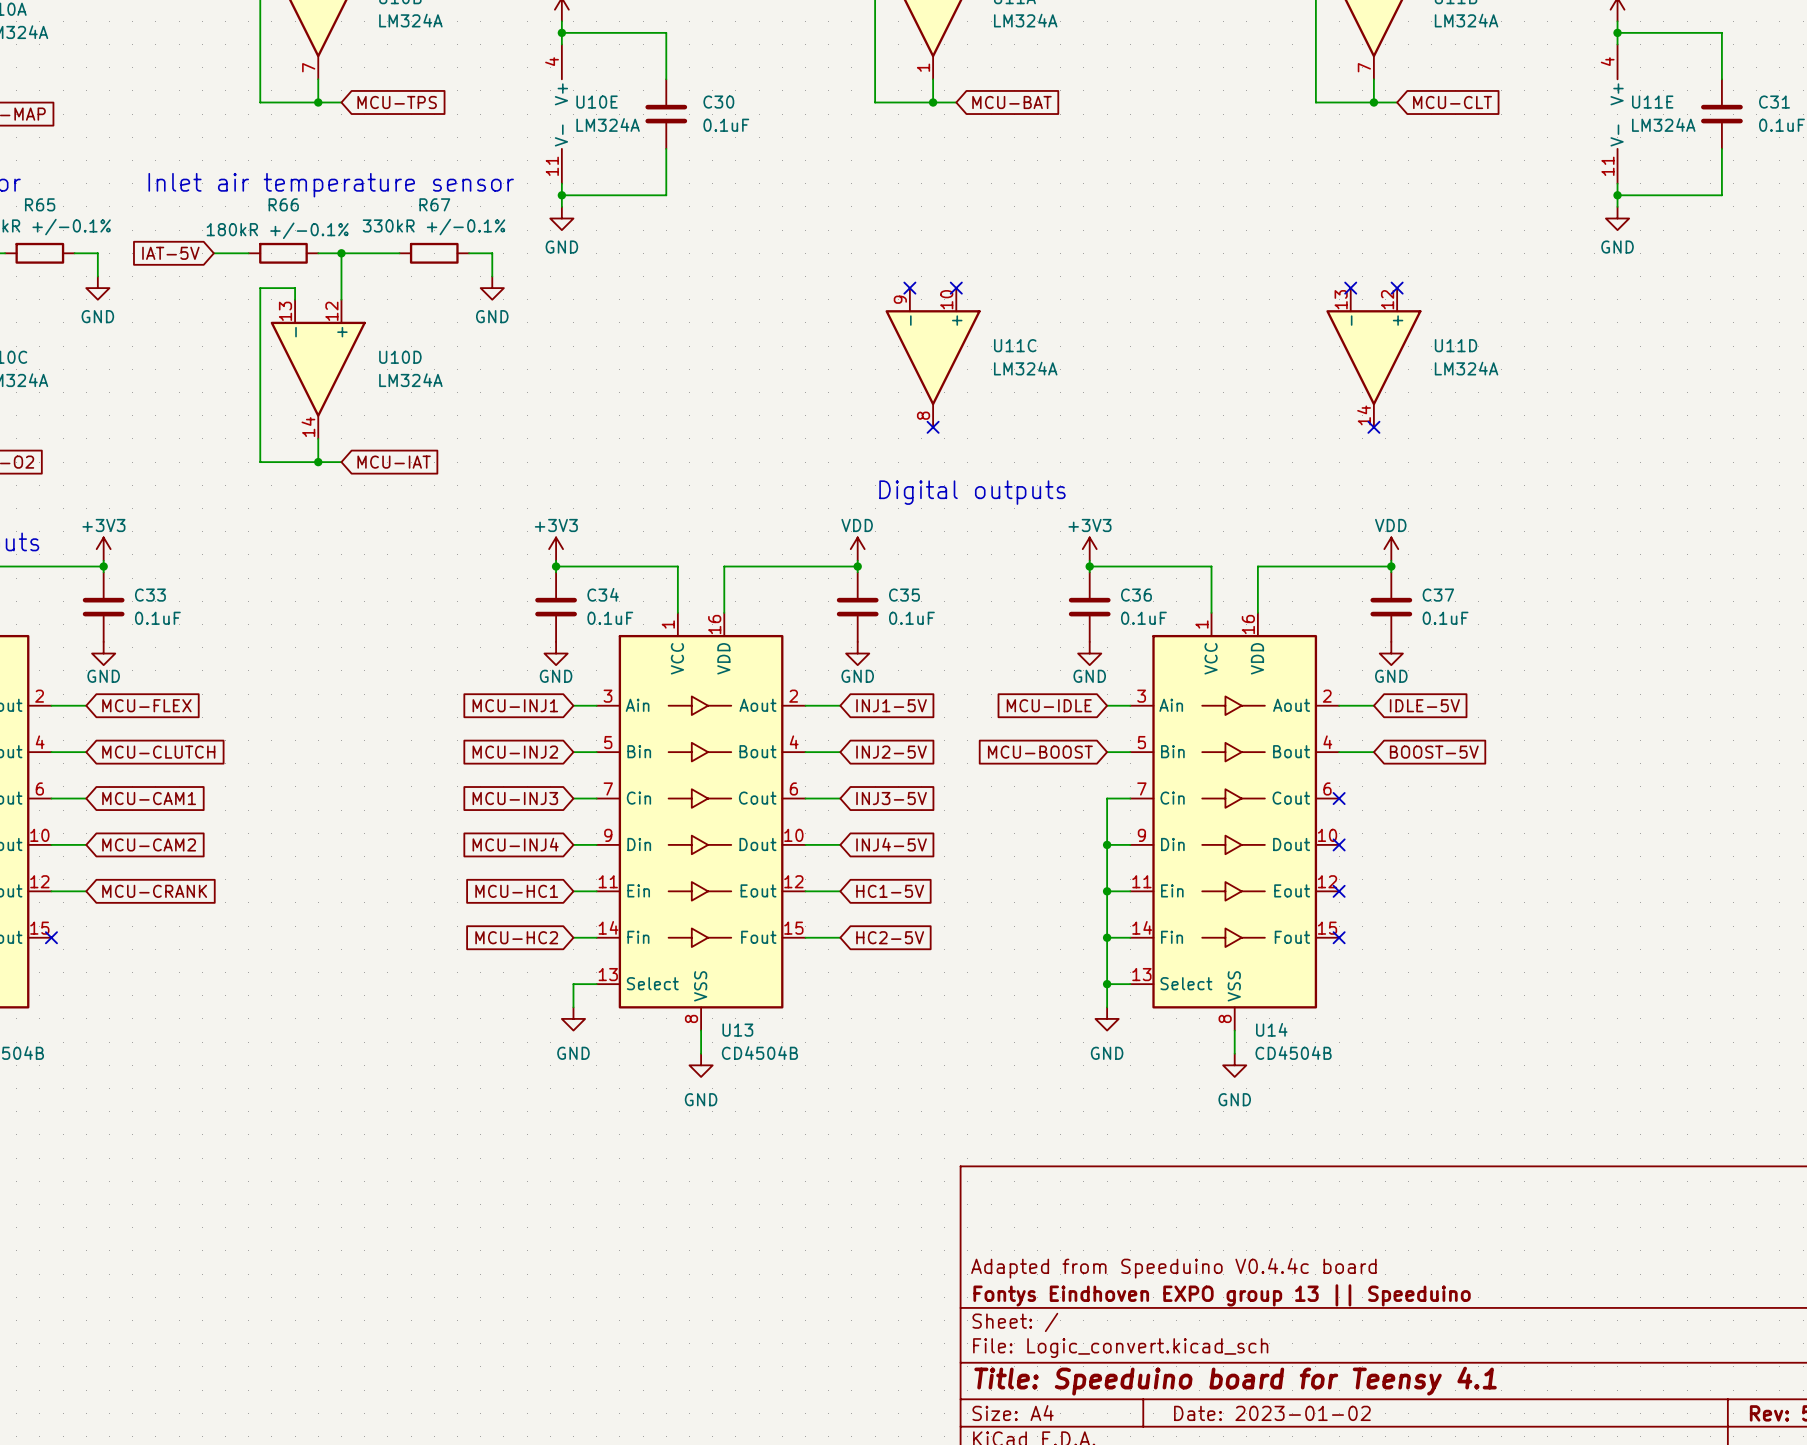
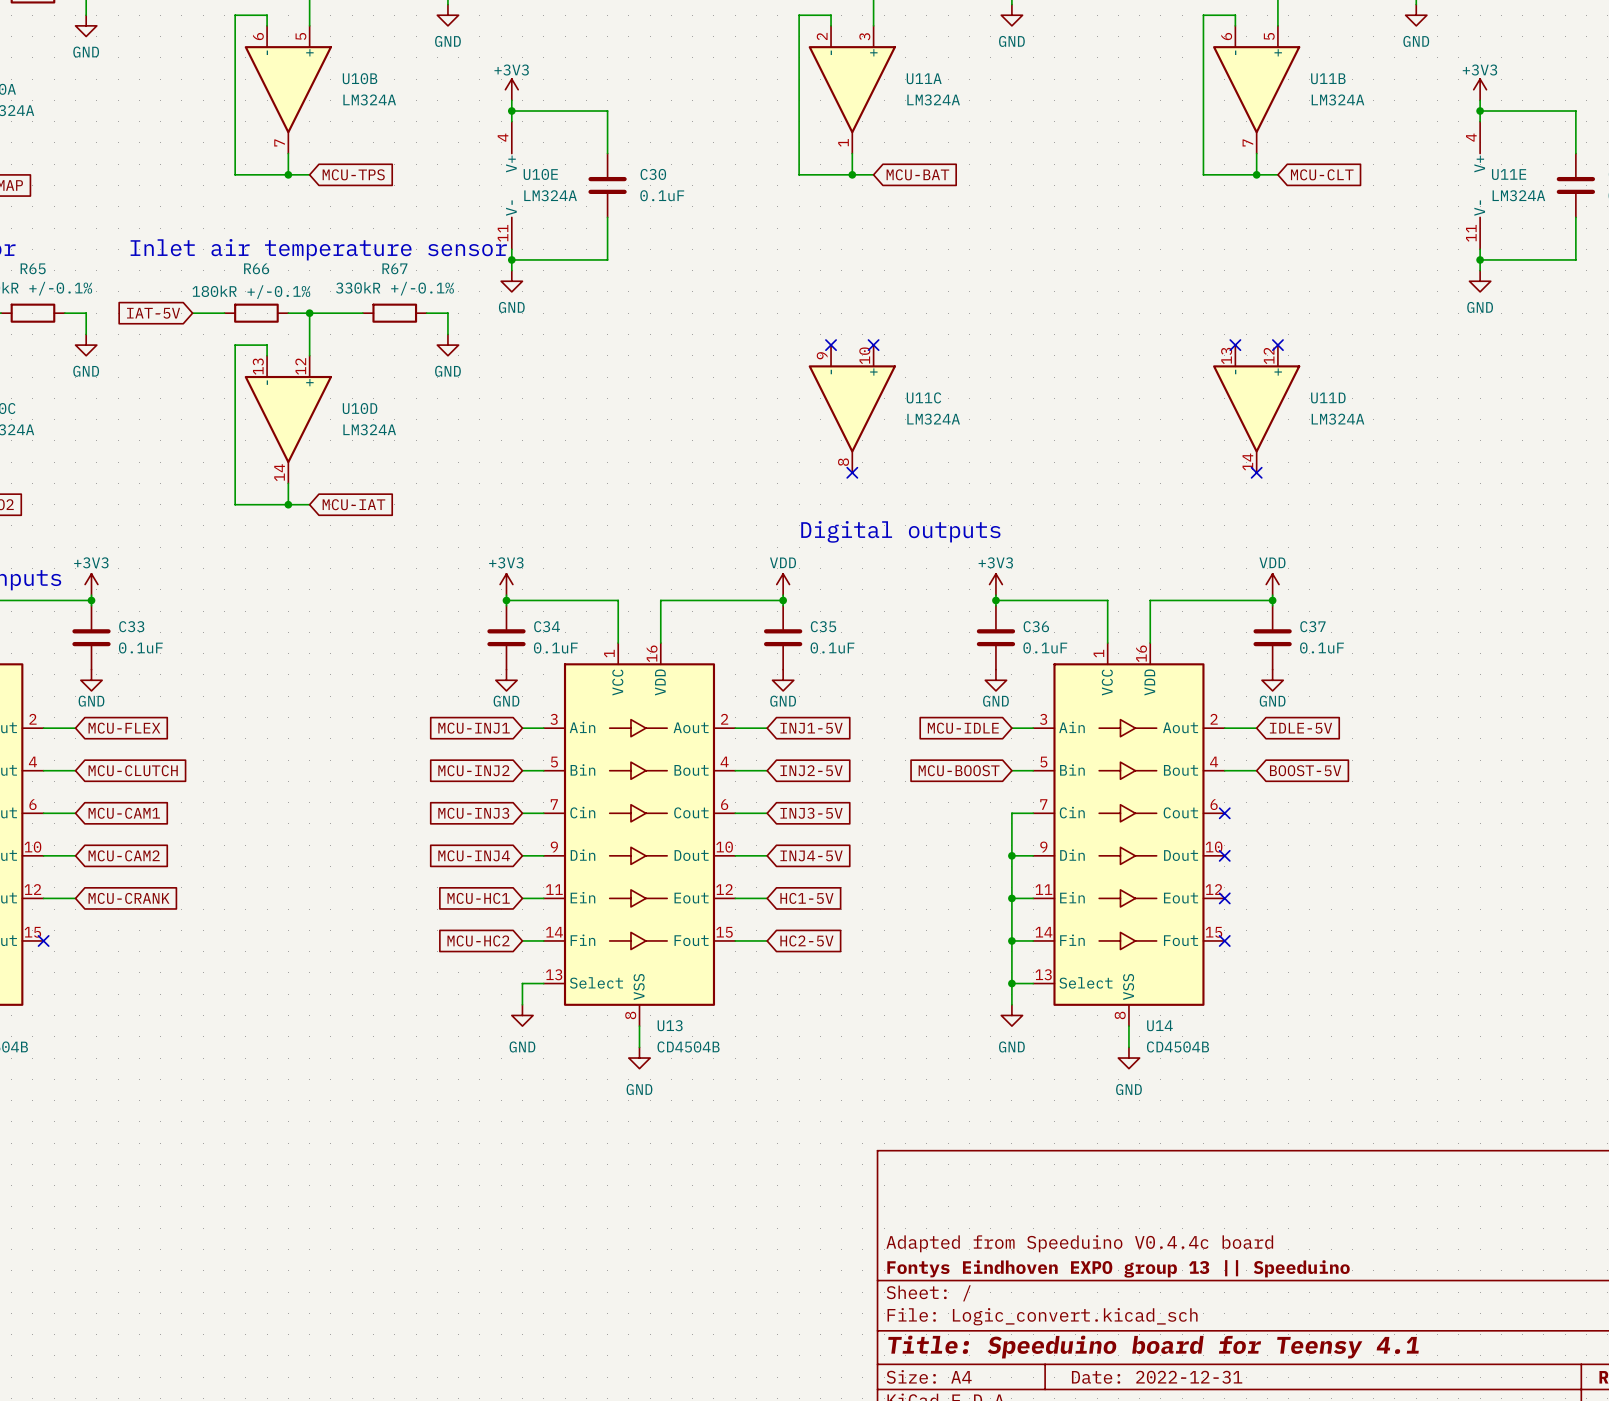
title block: Date: 2023-01-02 (1272, 1413) -> Date: 2022-12-31 (1157, 1377)

